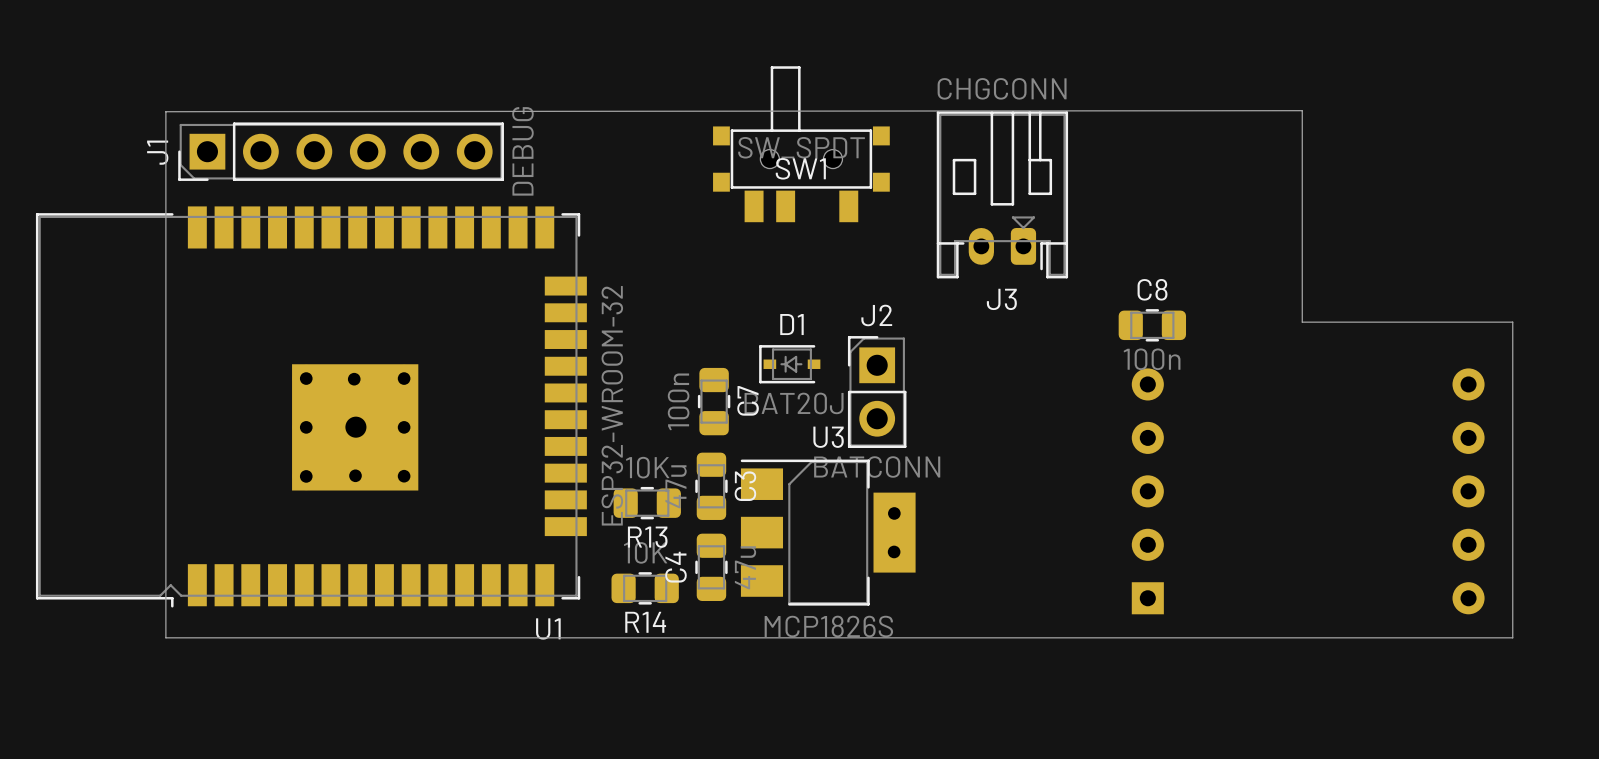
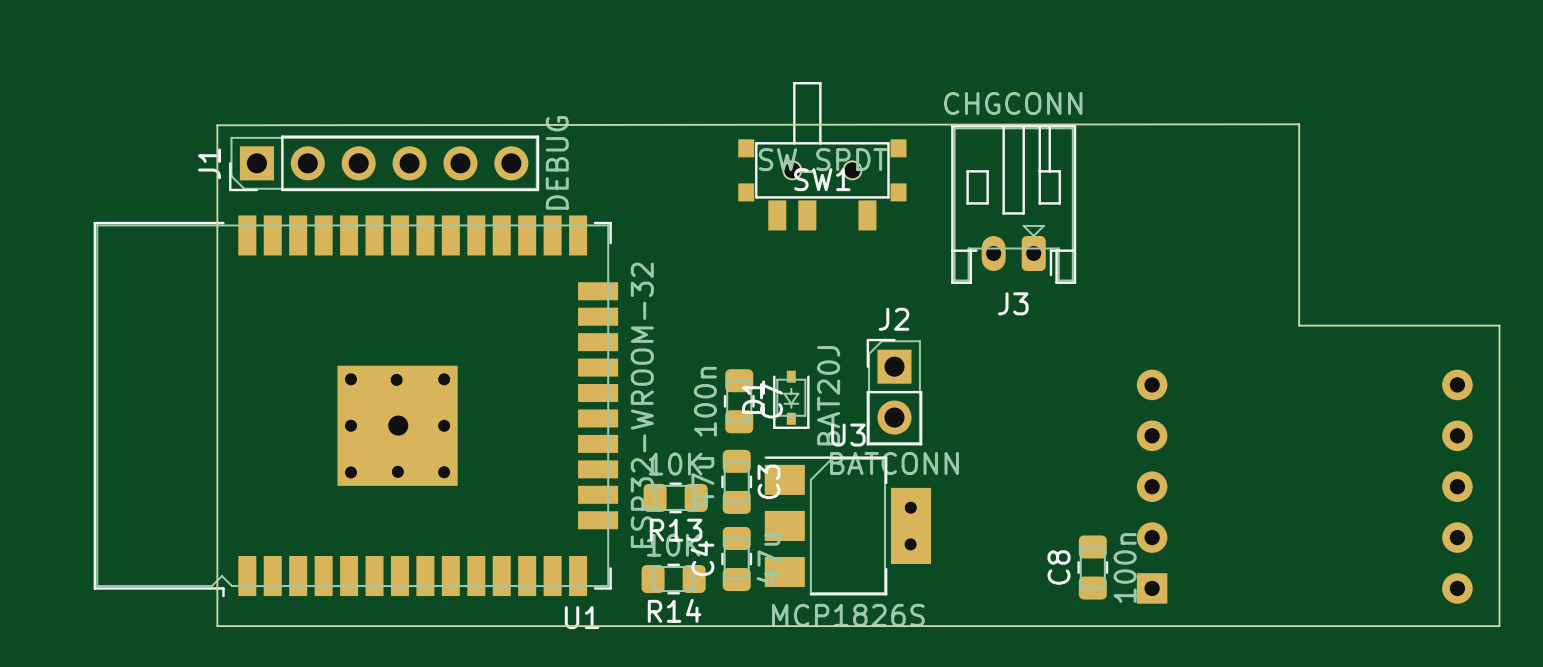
C8 name position: C8 (1152, 289) -> C8 (1059, 567)
C8 rotation: 0° (1152, 325) -> 90° clockwise (1092, 567)
C8 position: (1152, 325) -> (1092, 567)
C8 value position: 100n (1152, 359) -> 100n (1125, 568)
D1 rotation: 0° (789, 364) -> 90° counterclockwise (791, 399)
D1 position: (789, 364) -> (791, 399)

